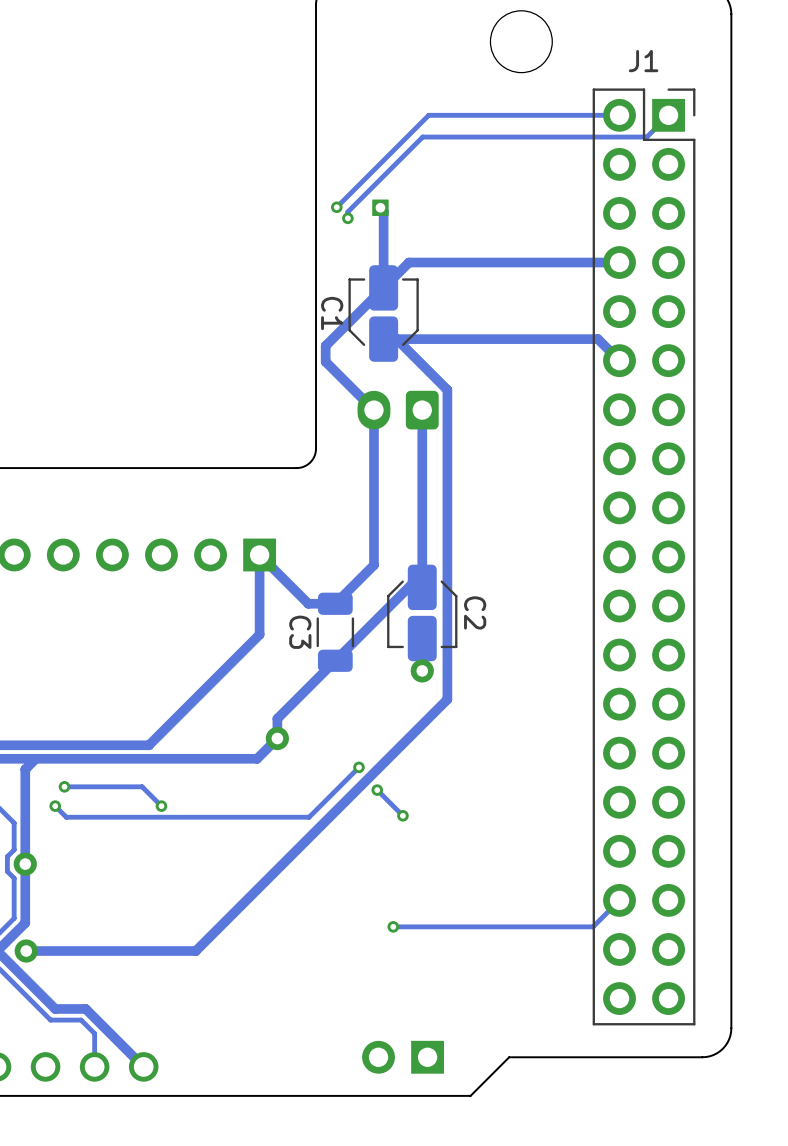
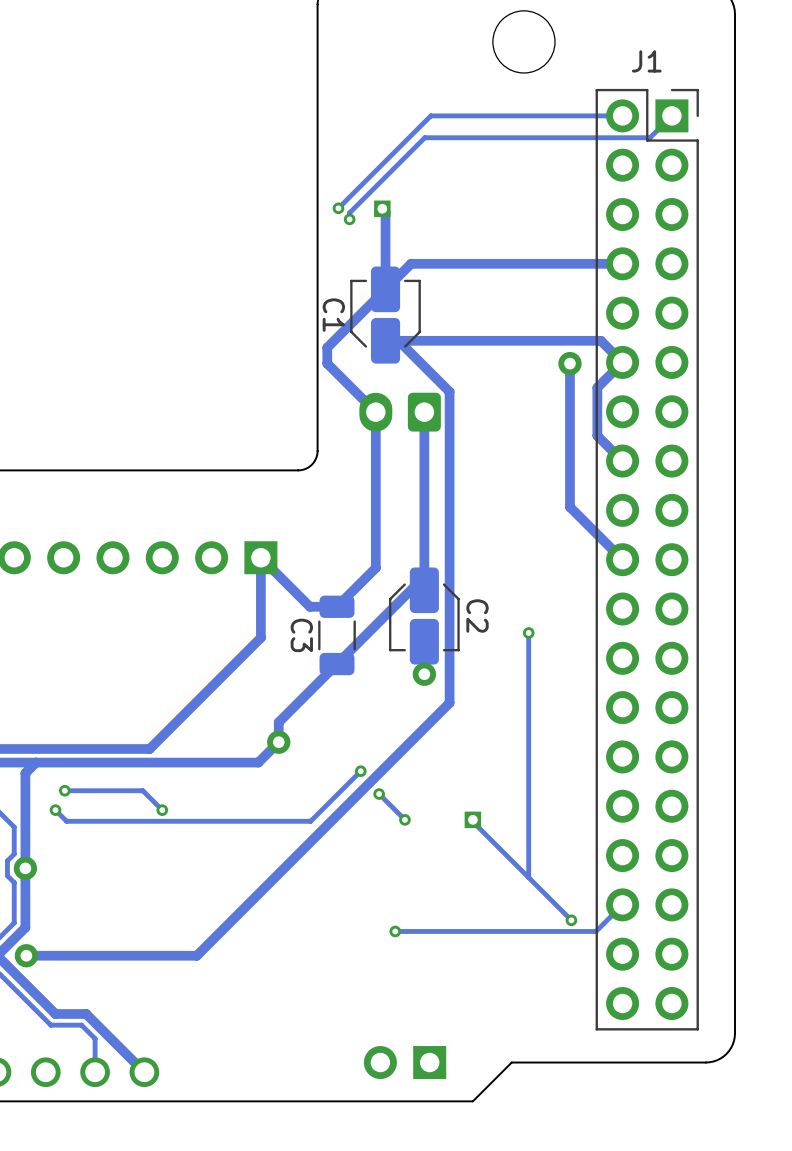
track: none -> (622, 362) (597, 387) (597, 435) (622, 461)
track: none -> (569, 363) (569, 507) (622, 559)
via: none -> (569, 363)
track: none -> (528, 632) (528, 877)
via: none -> (528, 632)
track: none -> (472, 819) (571, 920)
part: none -> (472, 819)
via: none -> (571, 920)

